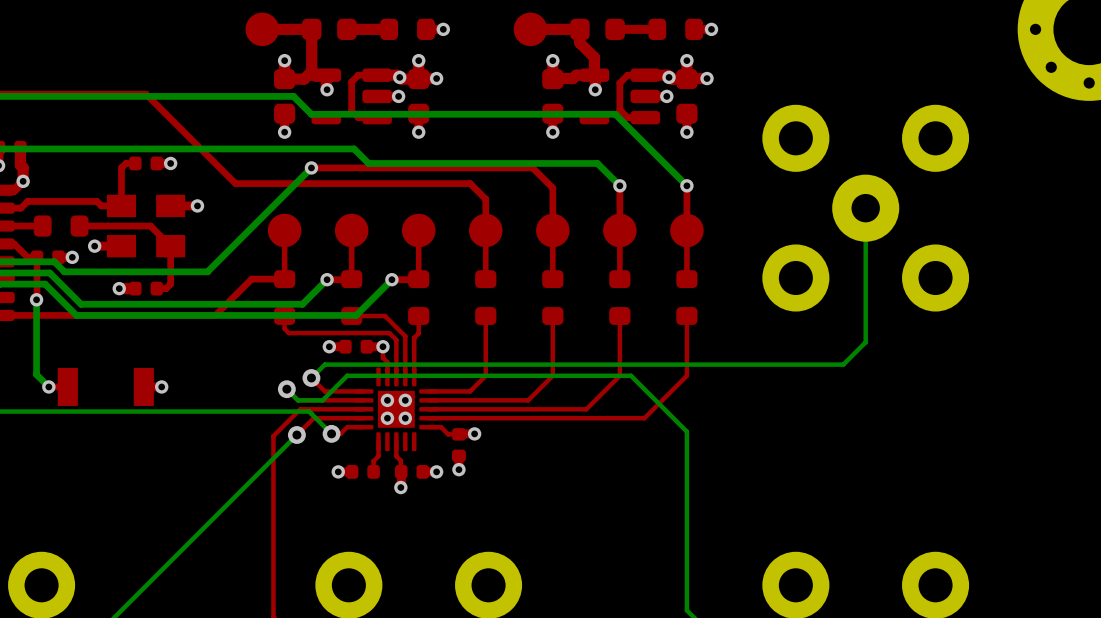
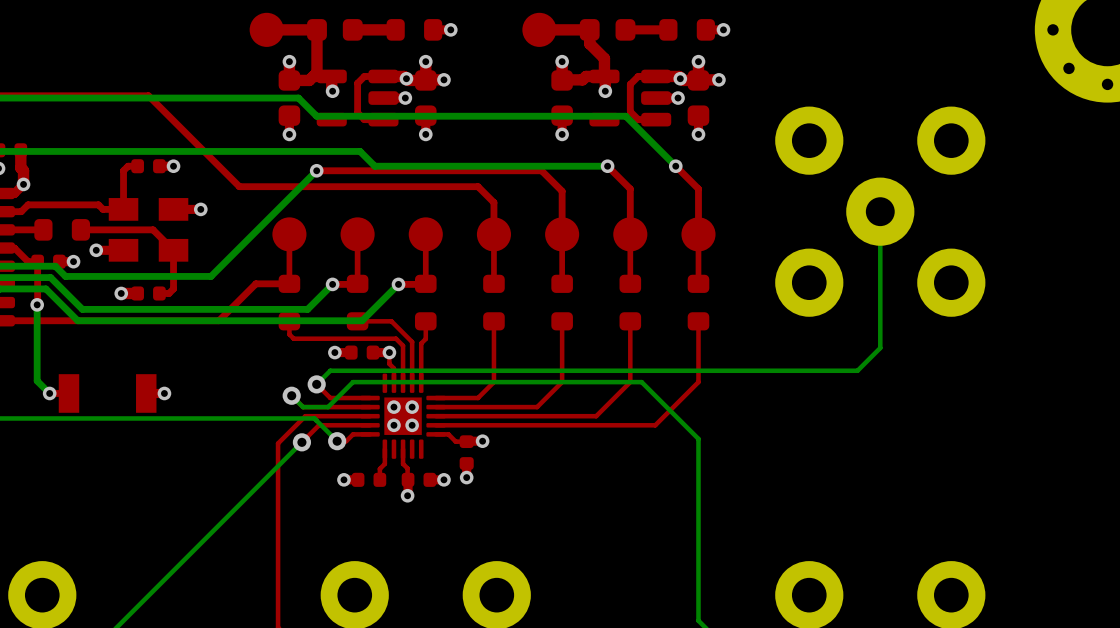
top track: none -> (607, 166) (630, 188)
bottom track: (597, 163) (619, 185) -> none
via: none -> (607, 166)
top track: none -> (675, 166) (698, 188)
bottom track: (664, 163) (686, 185) -> none
via: none -> (675, 166)
via: (619, 185) -> none
via: (686, 185) -> none

